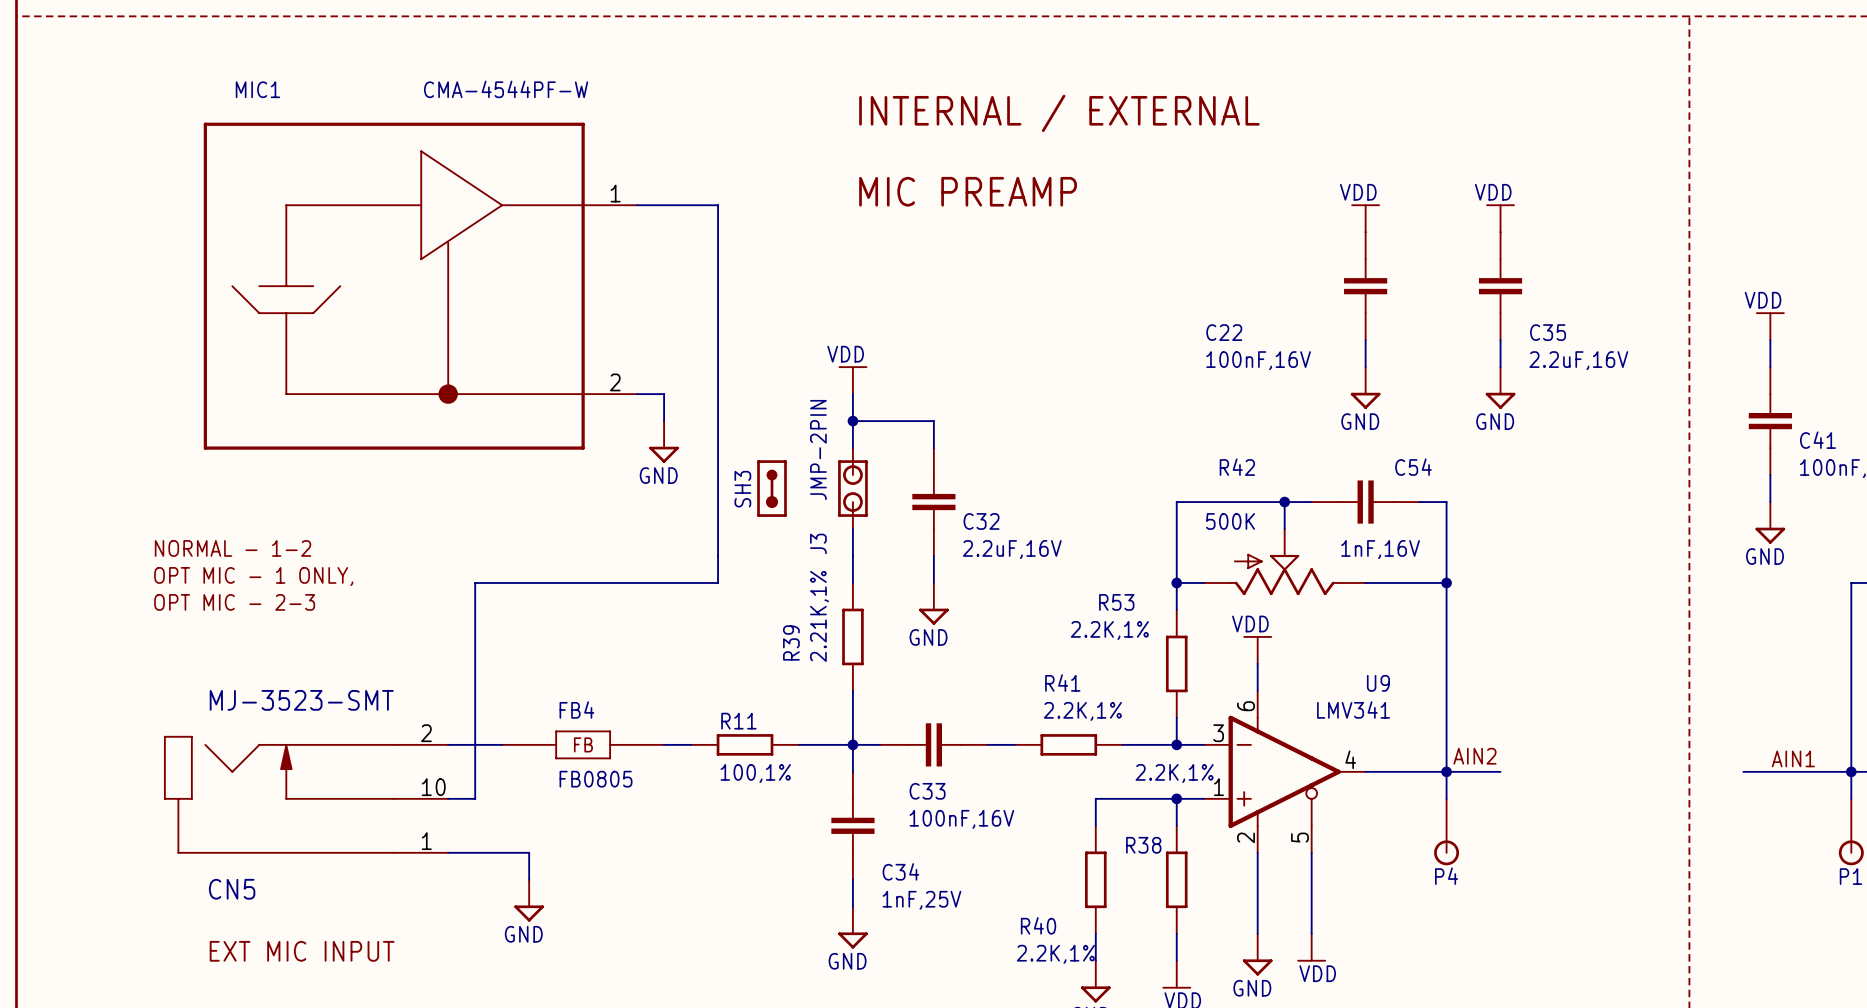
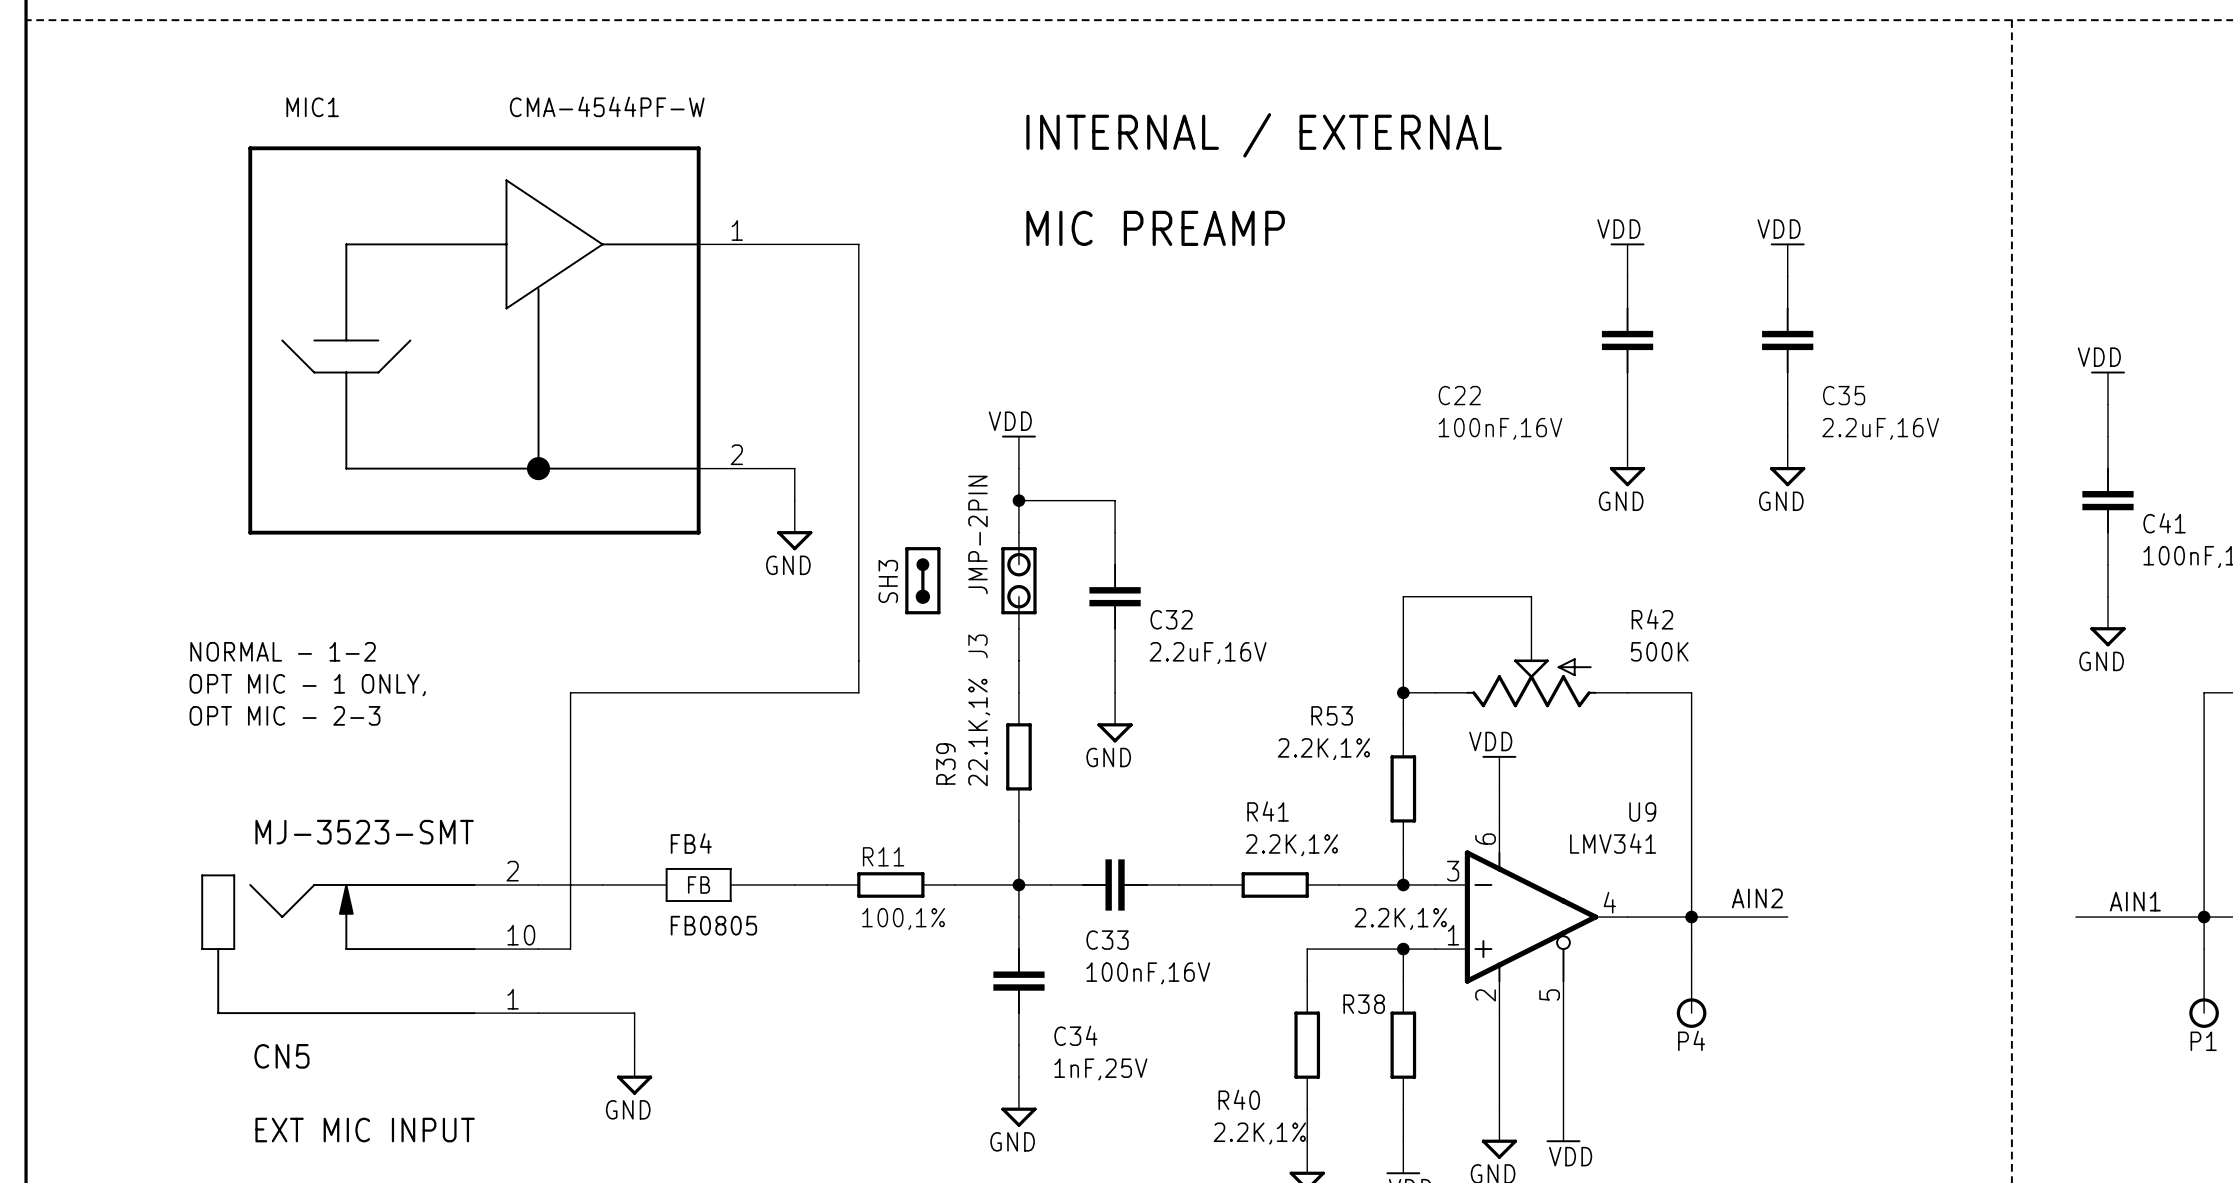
R42 name position: R42 (1237, 467) -> R42 (1652, 619)
wire: (1284, 502) (1311, 502) -> none
junction: (1284, 502) -> none
C54: 1nF,16V (1365, 502) -> none
wire: (1419, 502) (1446, 502) (1446, 798) -> none
R42 value position: 500K (1230, 521) -> 500K (1659, 651)
R42 flip: as is (1284, 574) -> left-right (1531, 682)
wire: (1419, 582) (1446, 582) -> (1691, 692) (1691, 949)
junction: (1446, 582) -> none
R39 value: 2.21K,1% (819, 616) -> 22.1K,1% (979, 732)
junction position: (1446, 771) -> (1691, 917)
P4 position: (1446, 832) -> (1691, 988)

